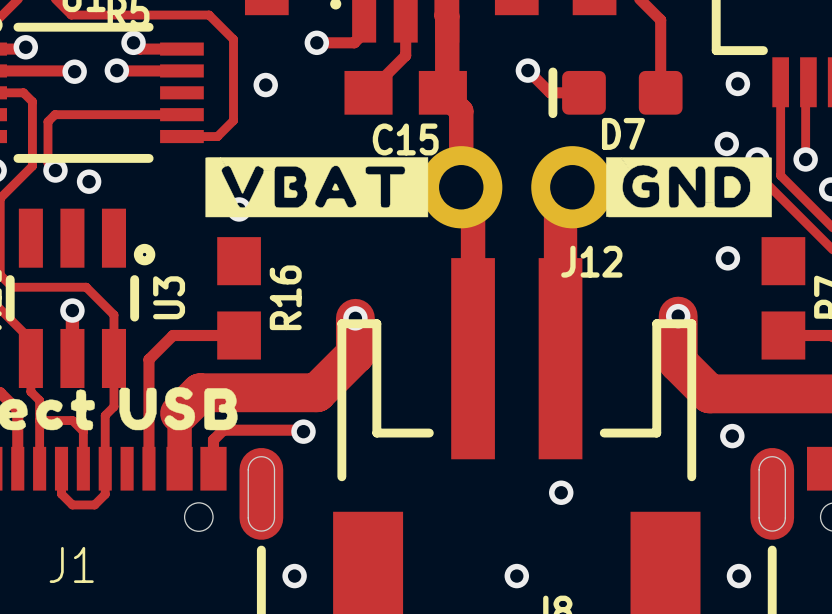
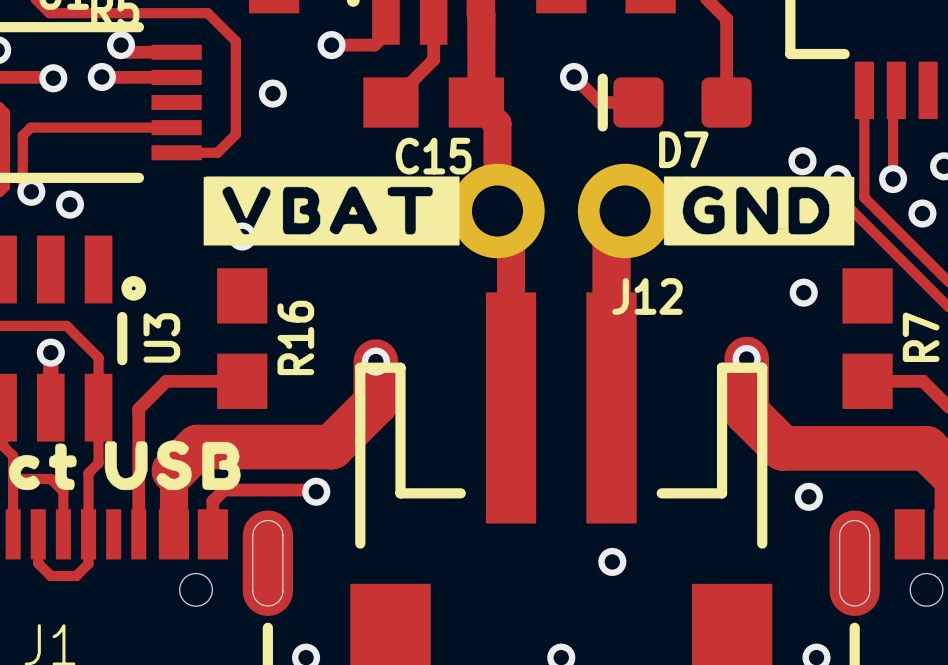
via: (737, 83) -> none

